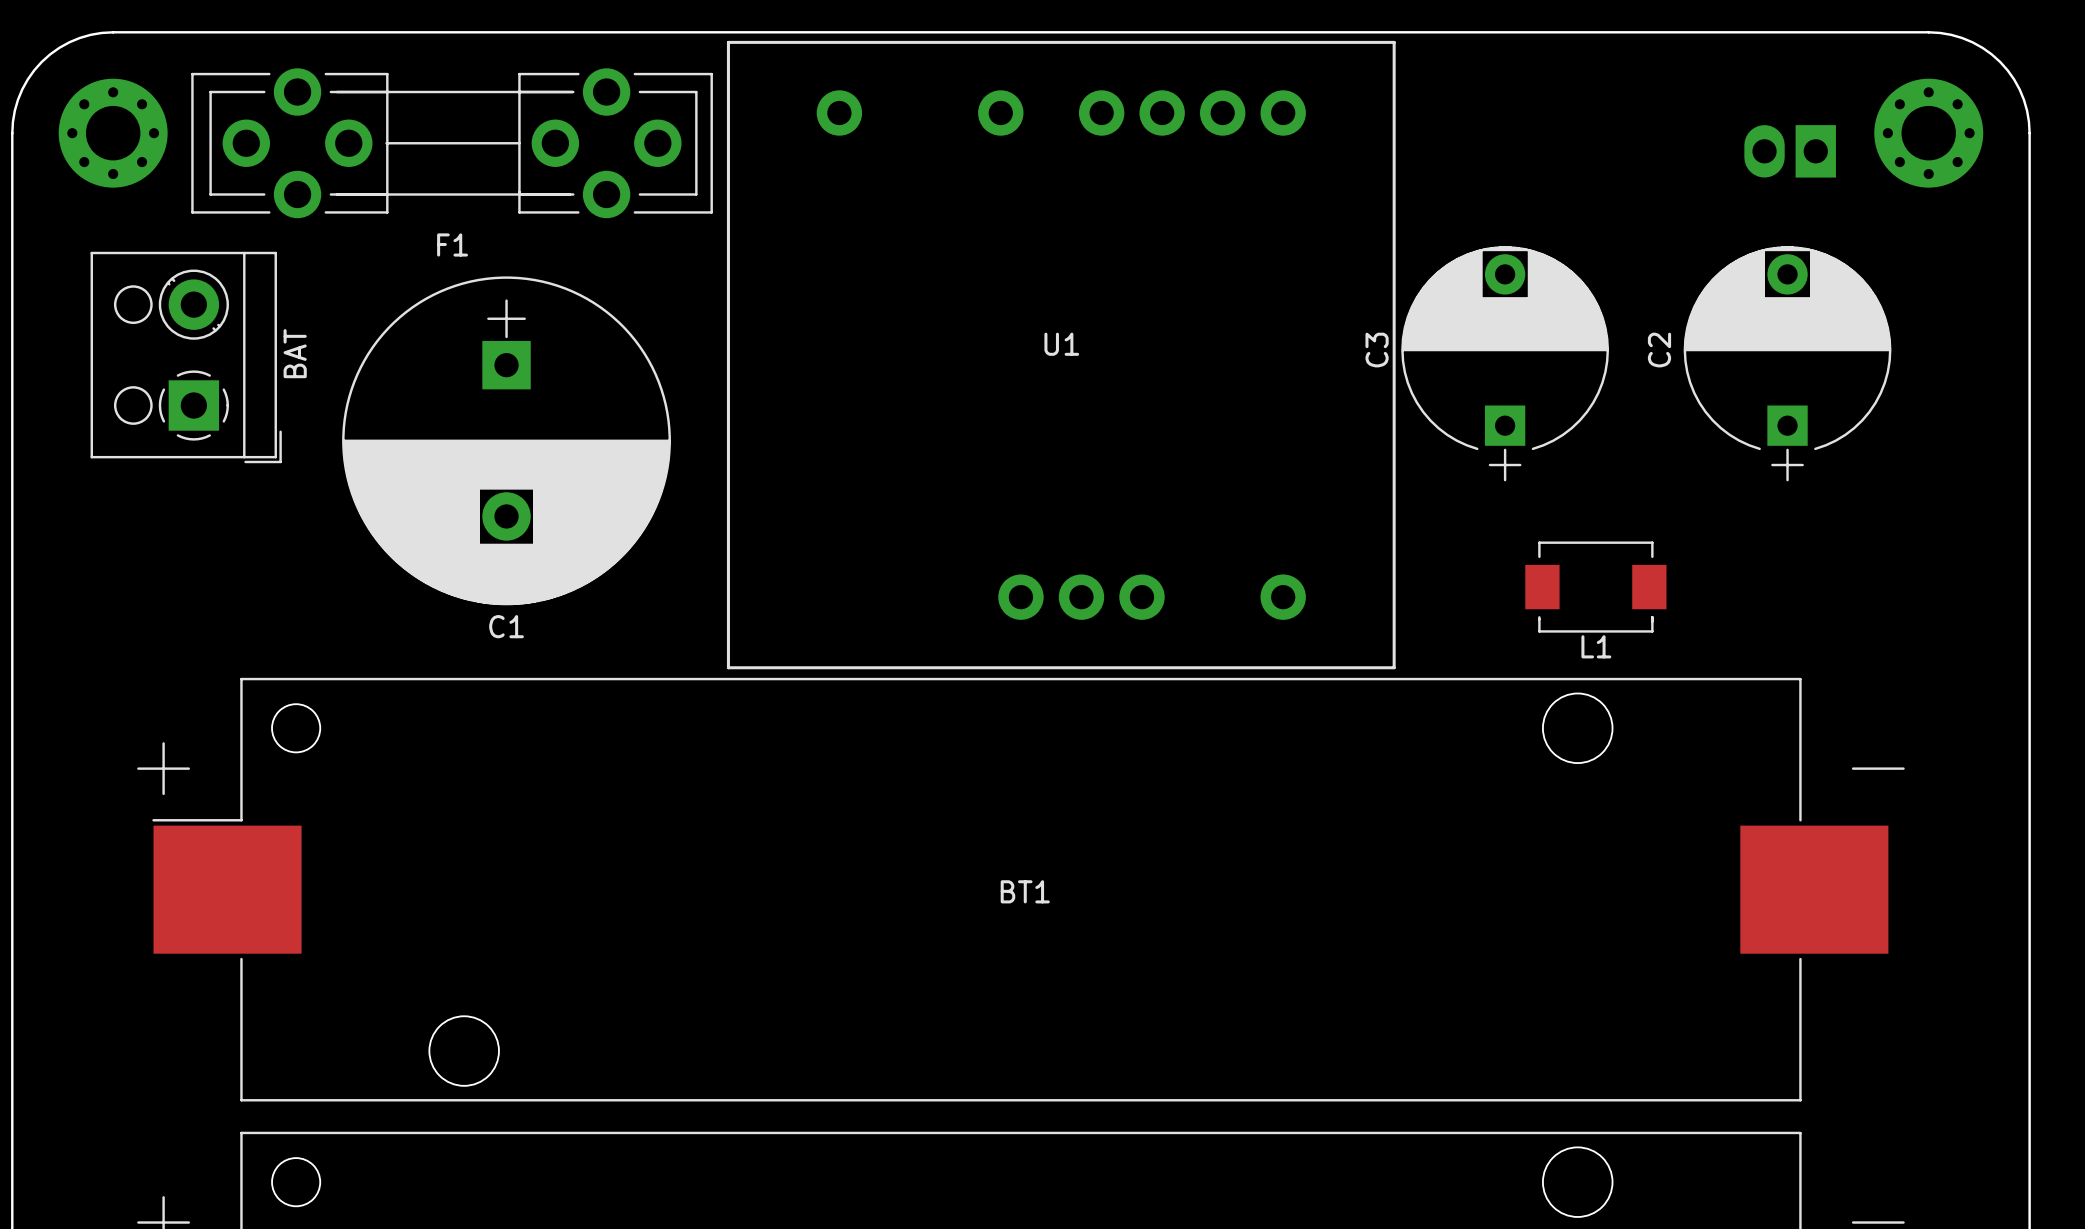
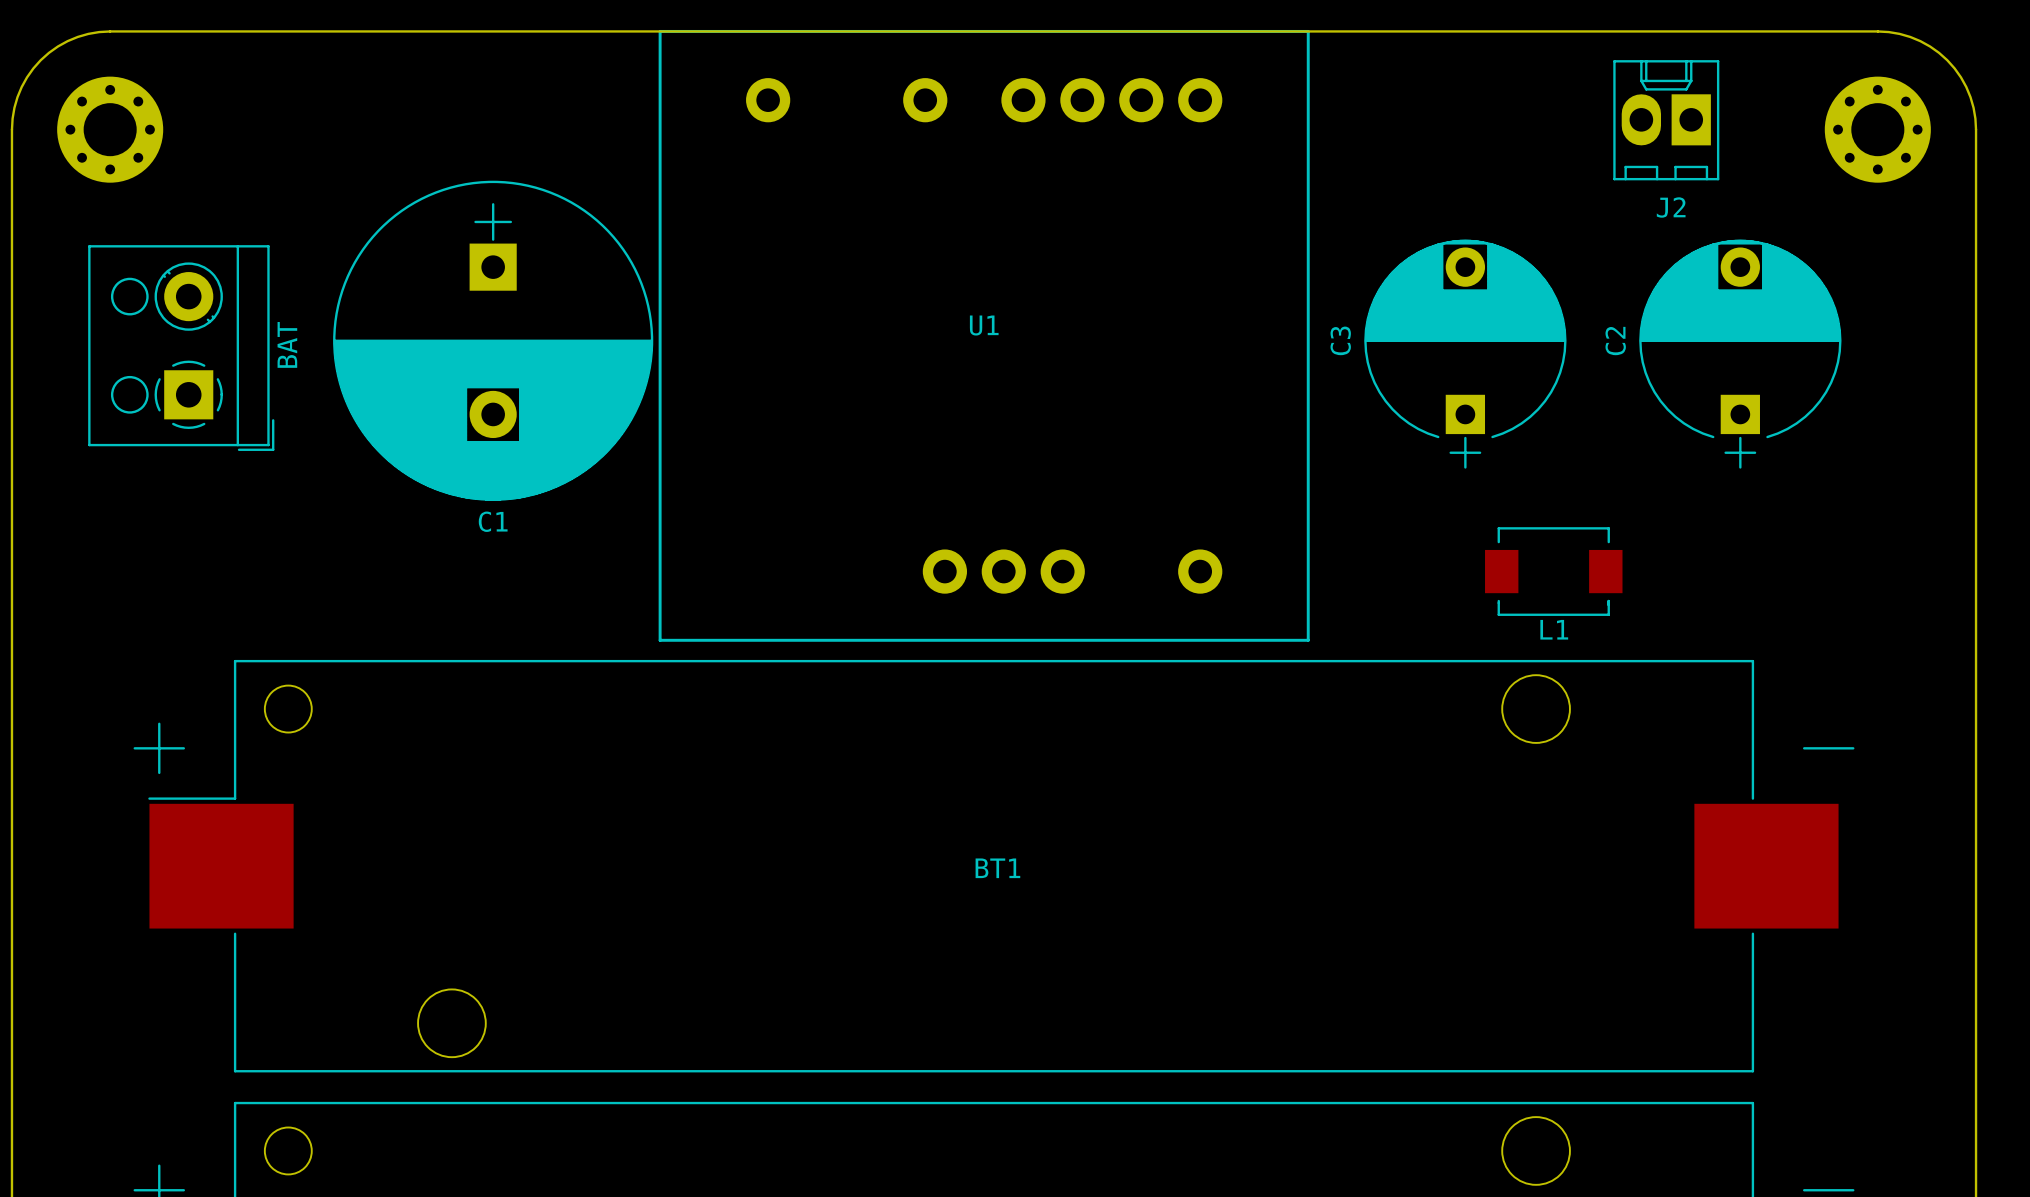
F1: (452, 143) -> none
J2 side: bottom (1790, 151) -> top (1666, 120)
U1 position: (1061, 355) -> (984, 335)
C1 position: (506, 440) -> (493, 340)

